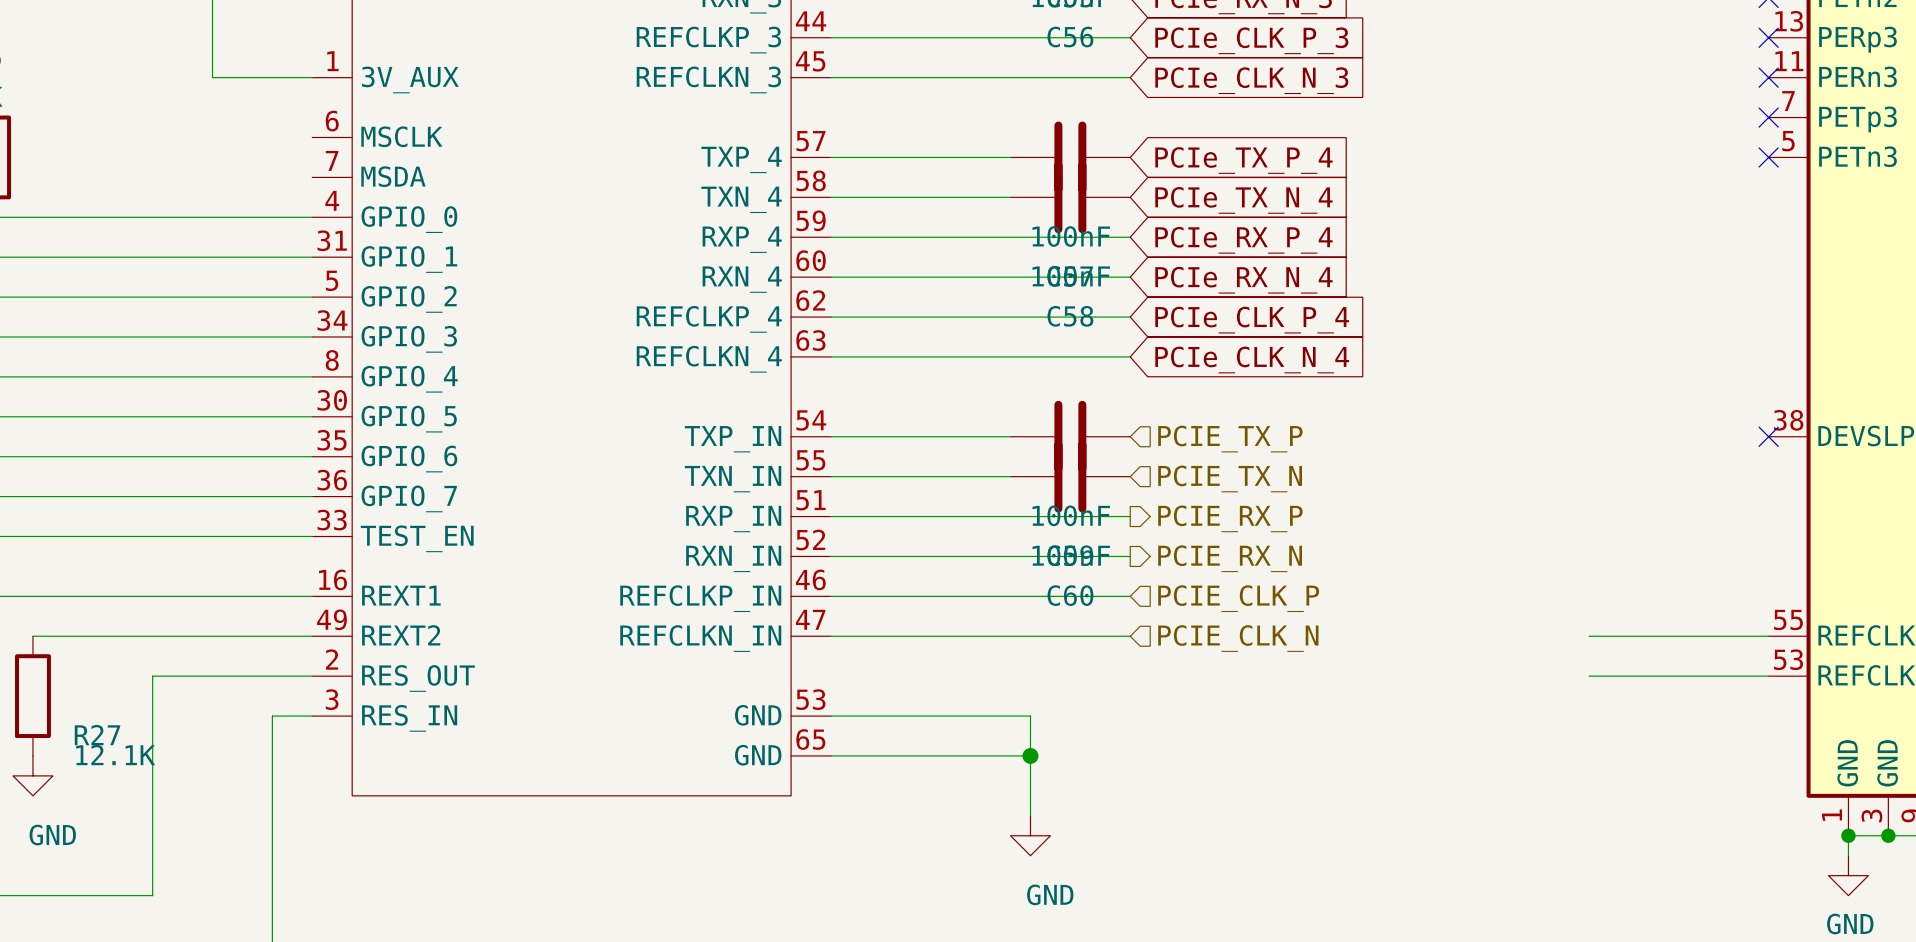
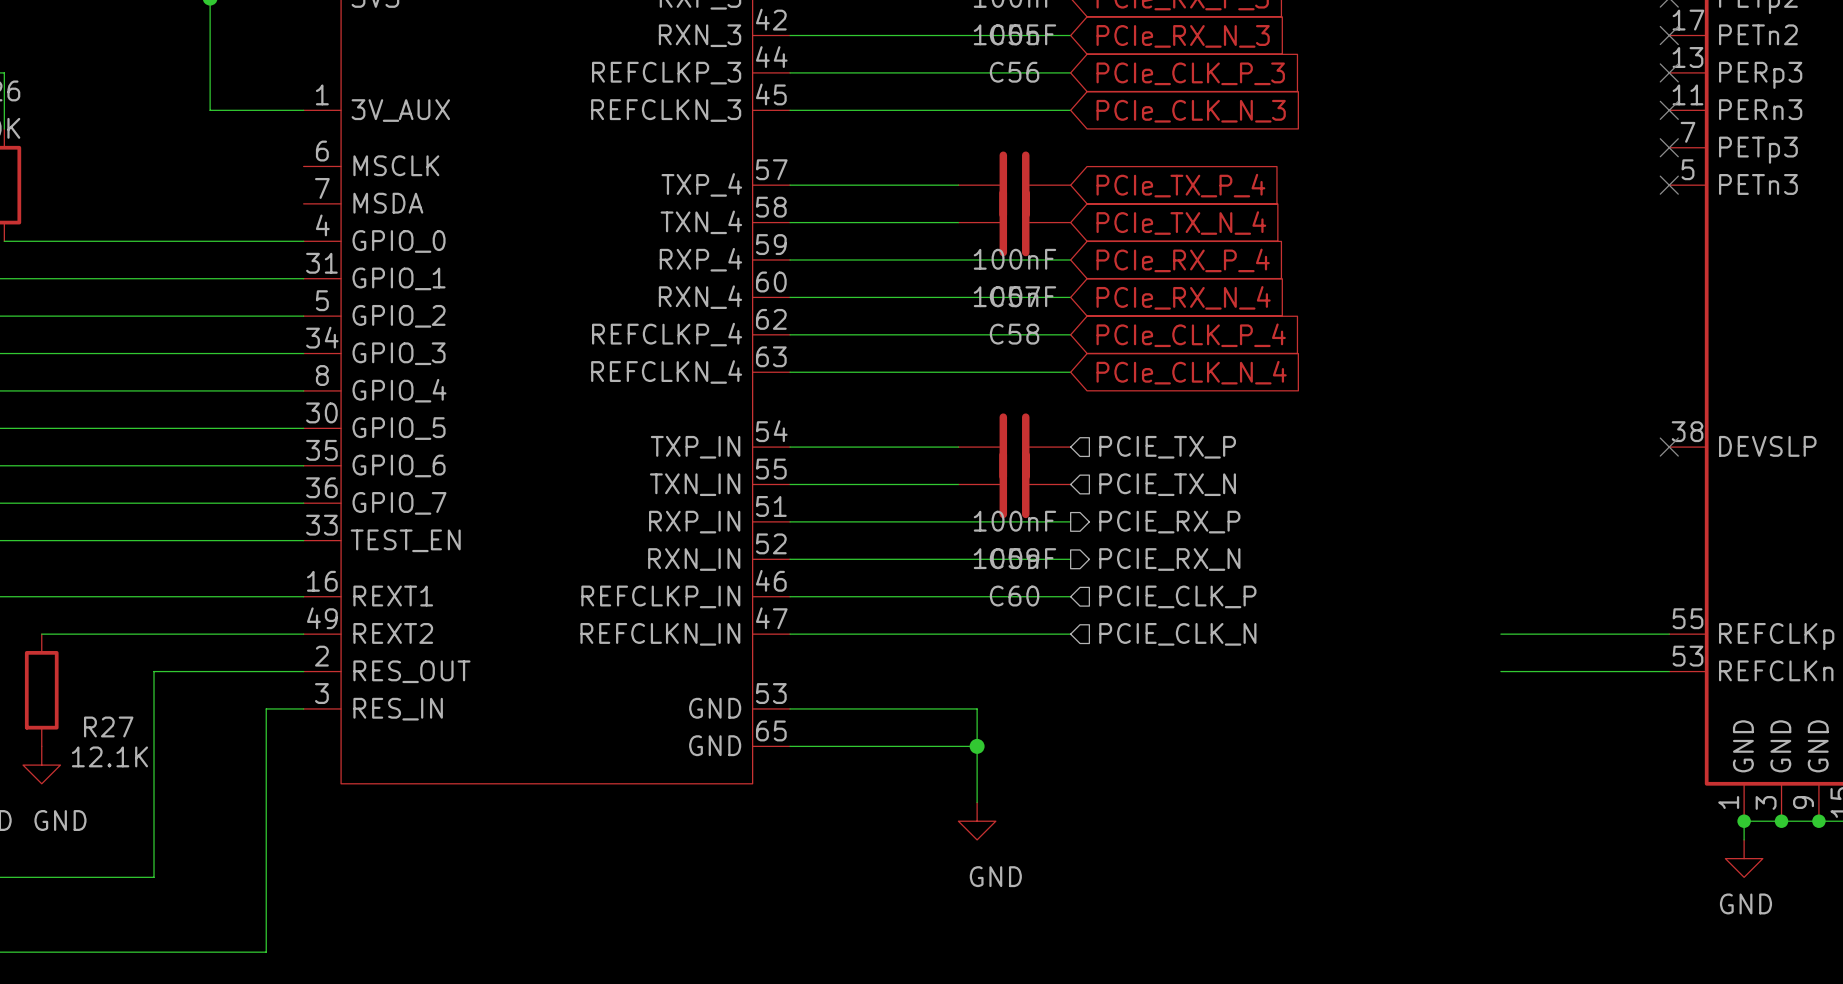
R27 value position: 12.1K (115, 755) -> 12.1K (109, 756)

